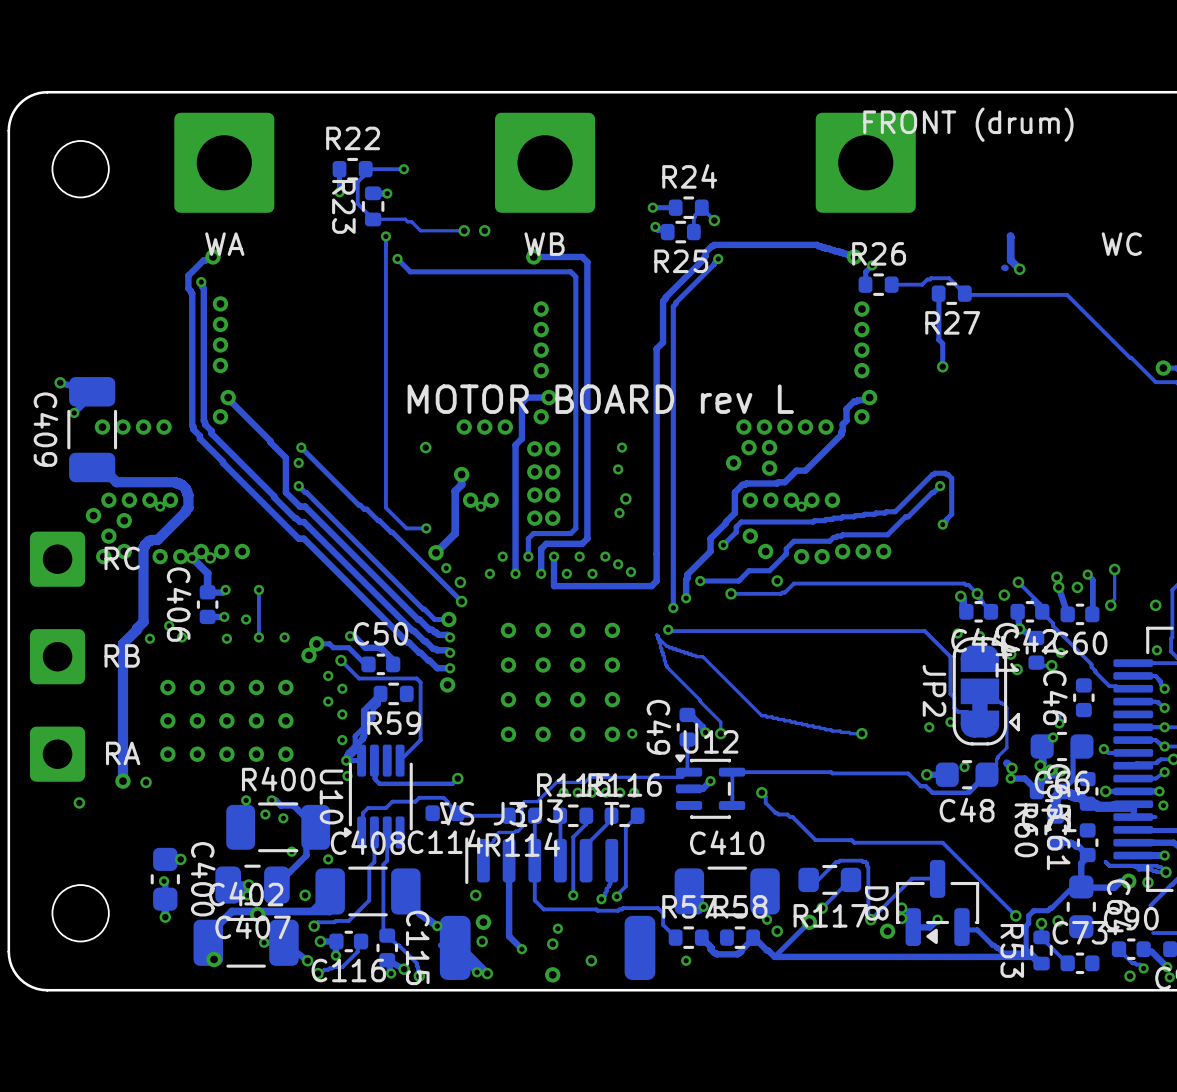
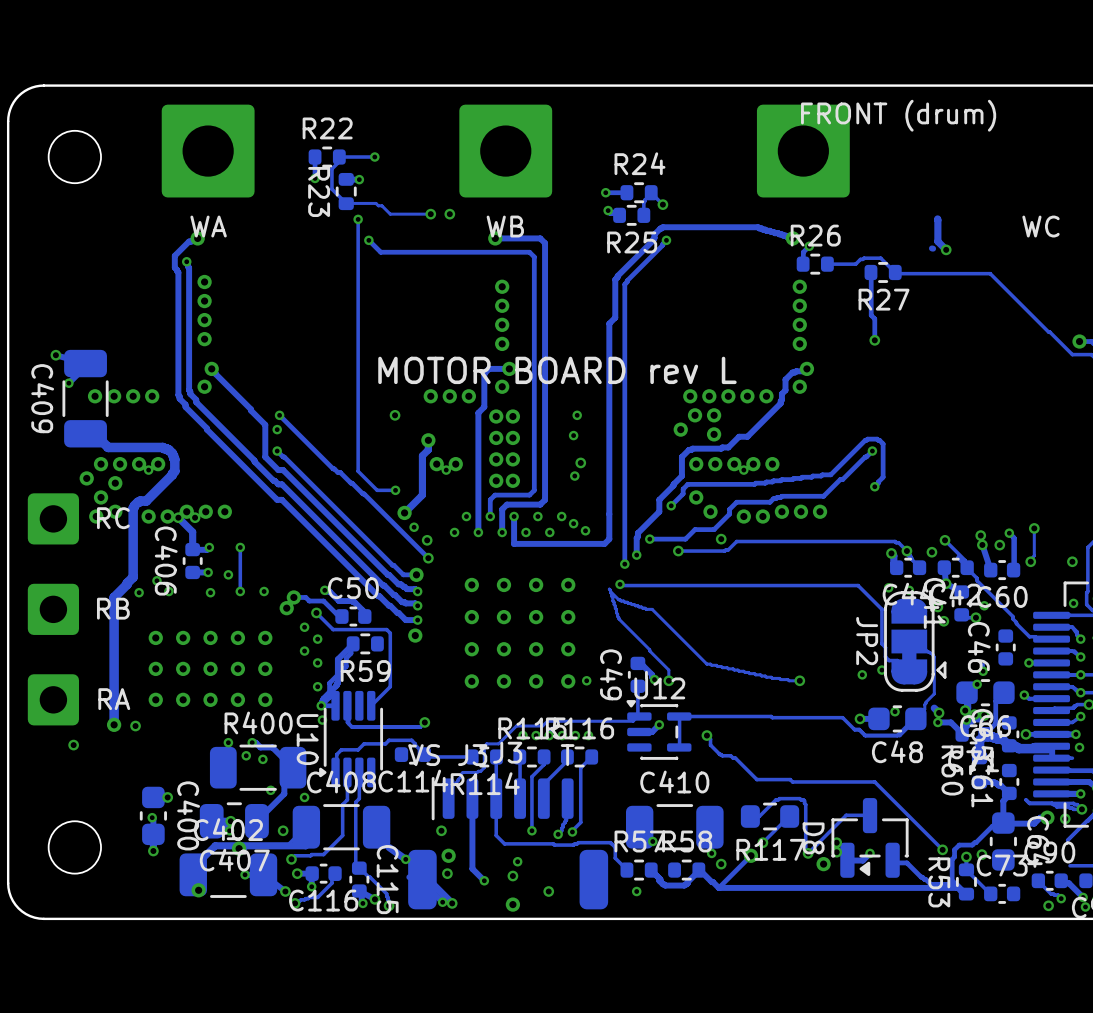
via: none -> (1028, 662)

